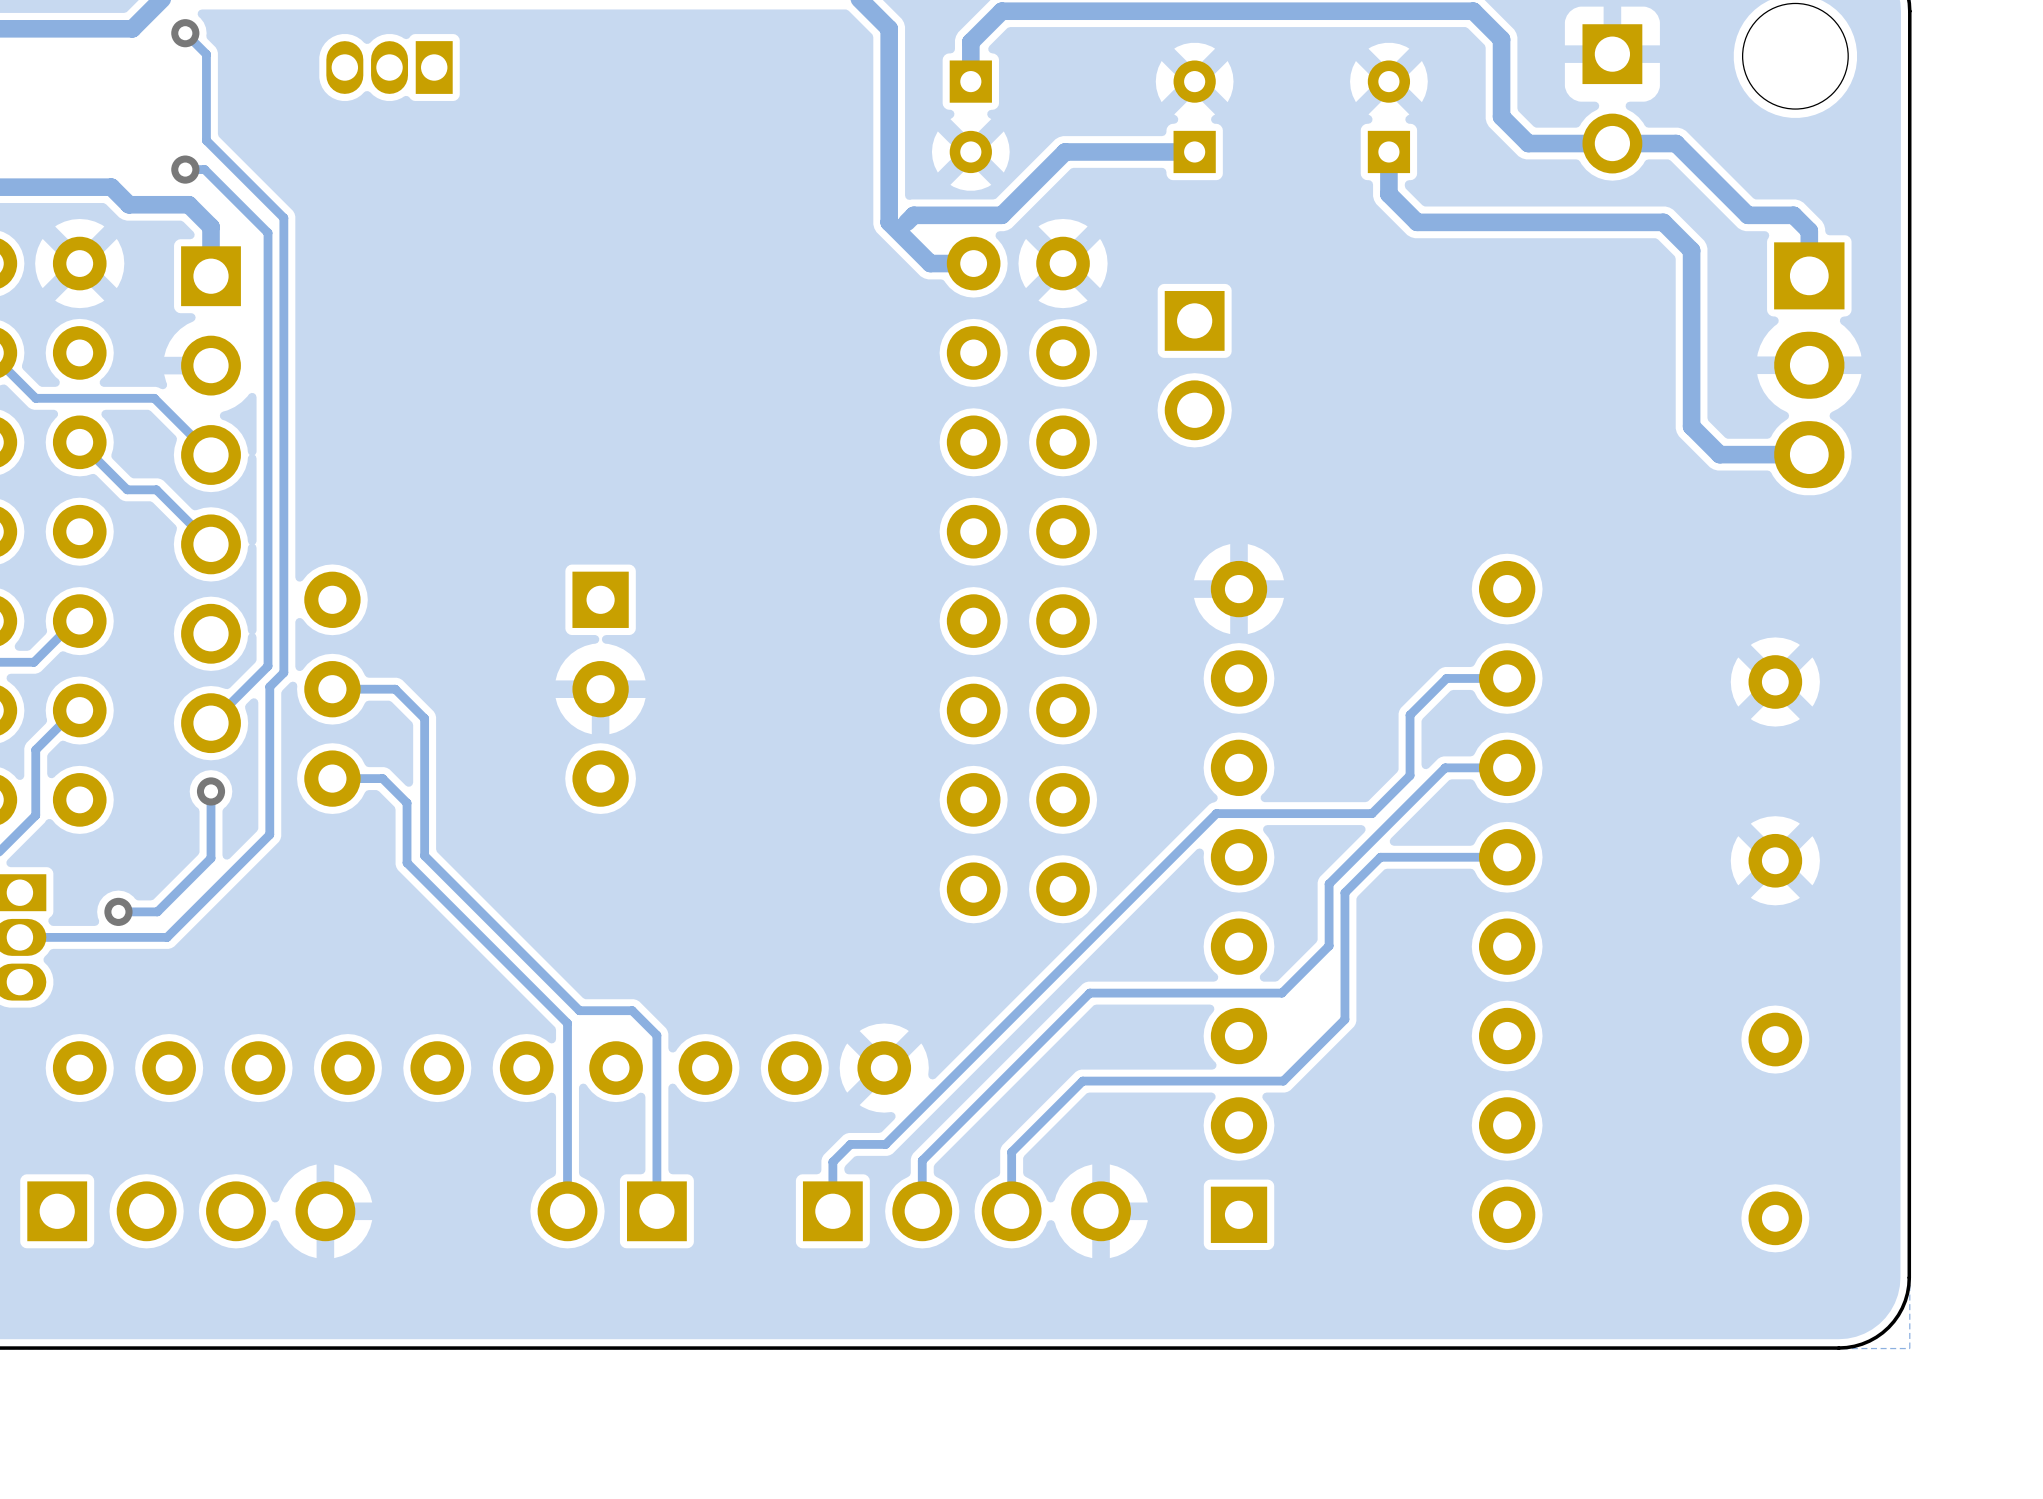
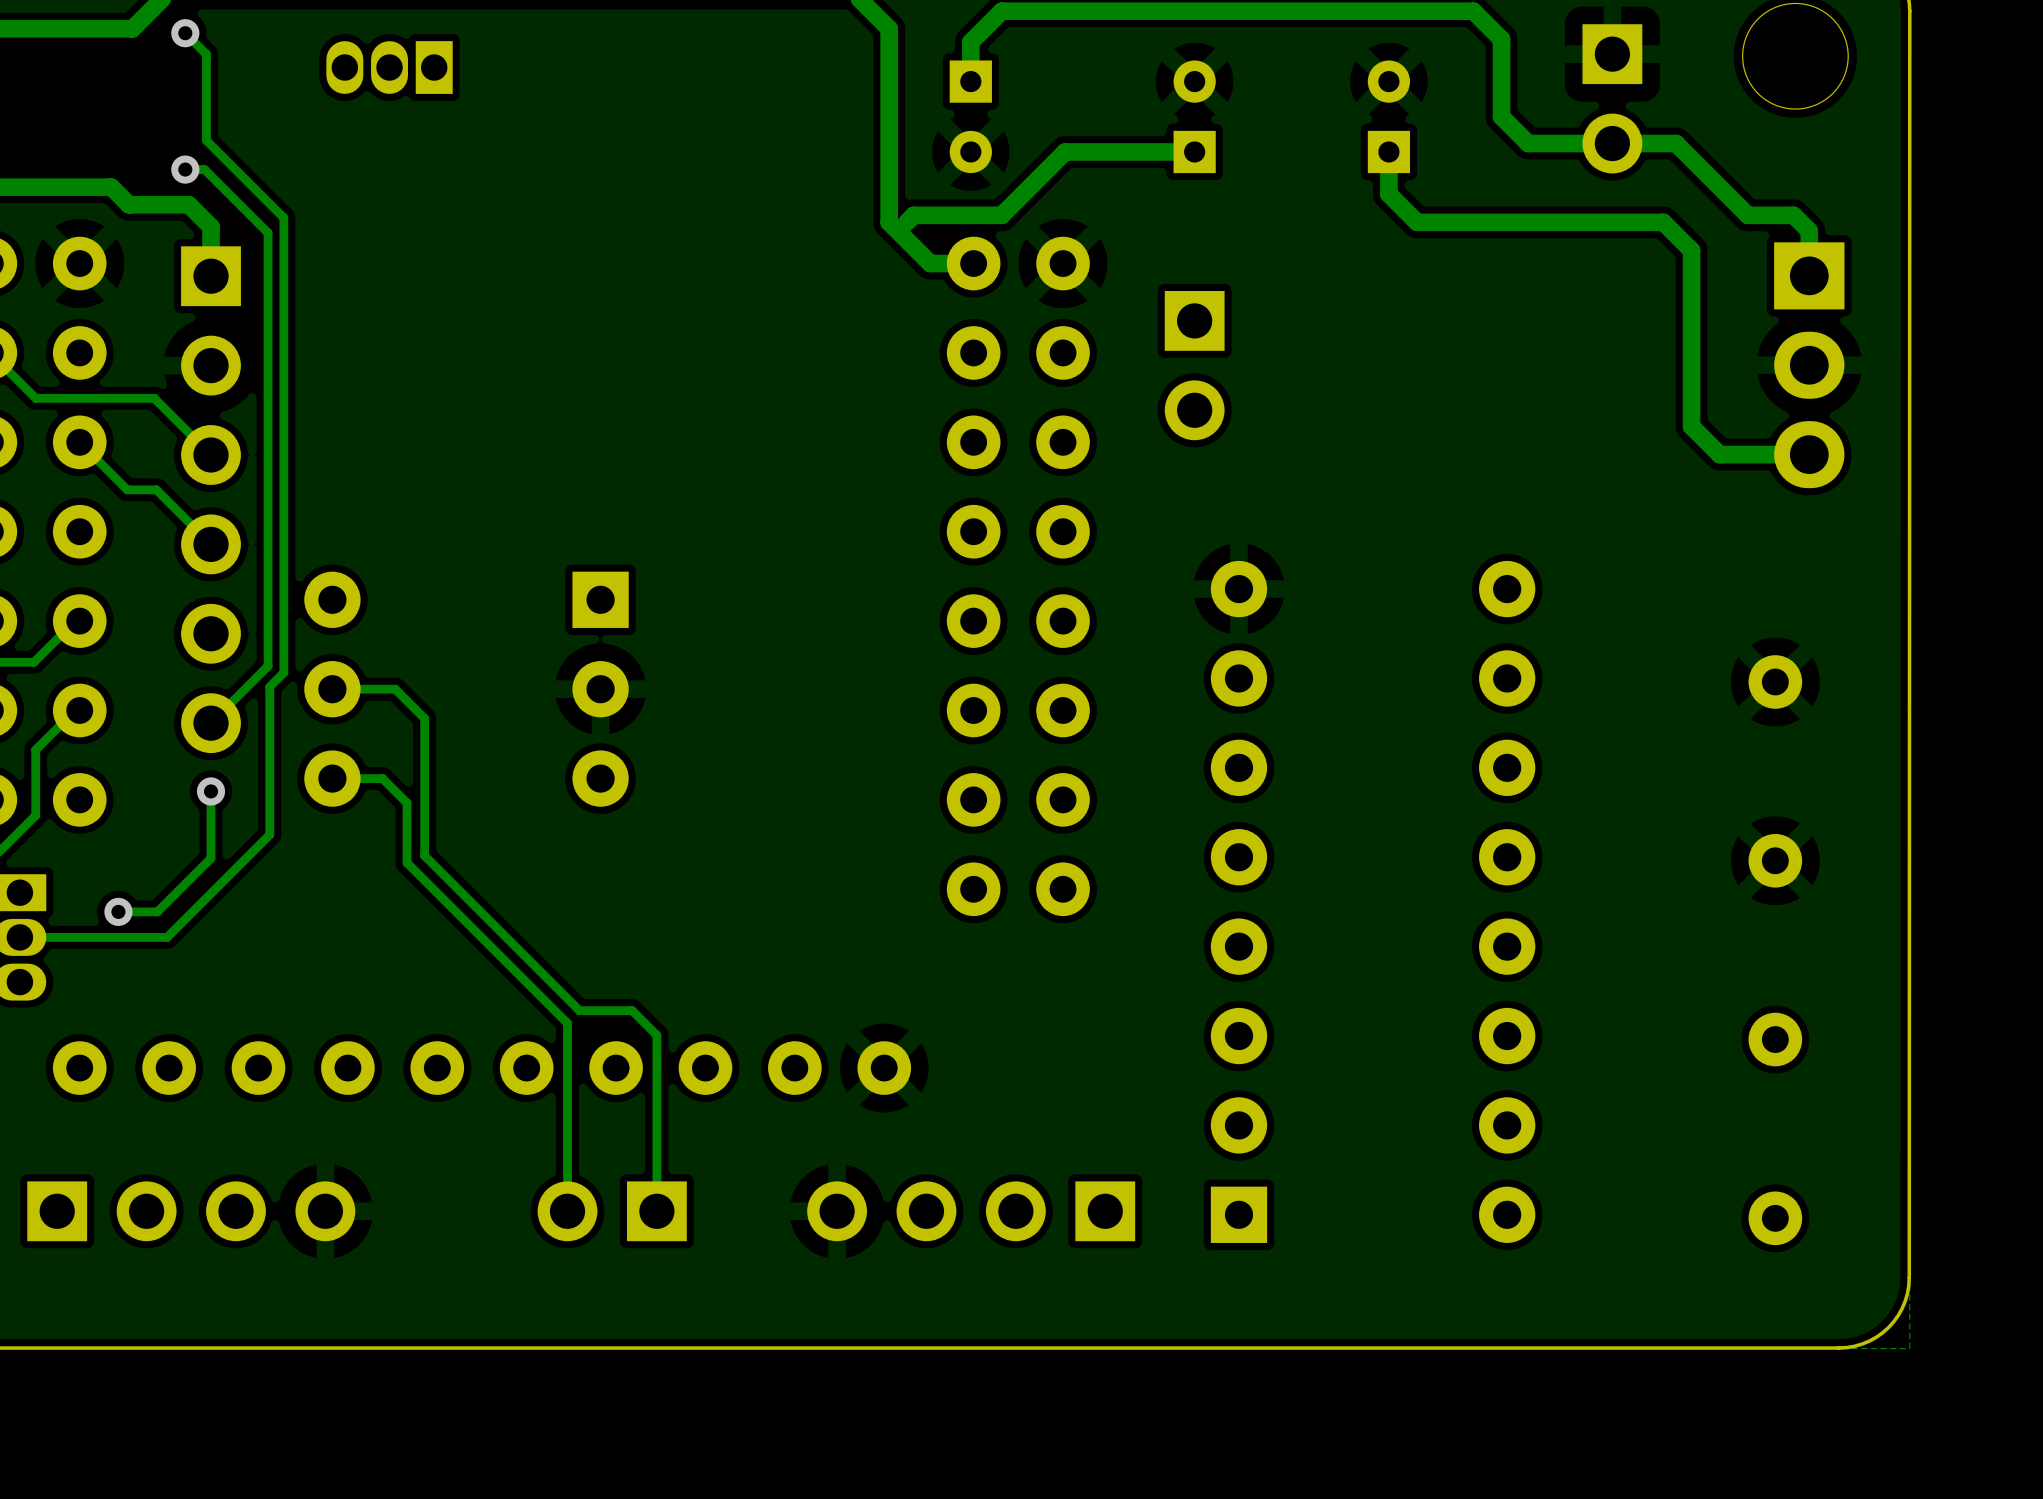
track: (1507, 678) (1446, 678) (1410, 715) (1410, 775) (1372, 813) (1216, 813) (885, 1144) (850, 1144) (832, 1162) (832, 1211) -> none
track: (1507, 767) (1445, 767) (1329, 883) (1329, 945) (1281, 993) (1089, 993) (922, 1160) (922, 1211) -> none
track: (1507, 857) (1380, 857) (1344, 892) (1344, 1019) (1283, 1081) (1082, 1081) (1011, 1152) (1011, 1211) -> none
part rotation: 0° (966, 1211) -> 180° (971, 1211)

